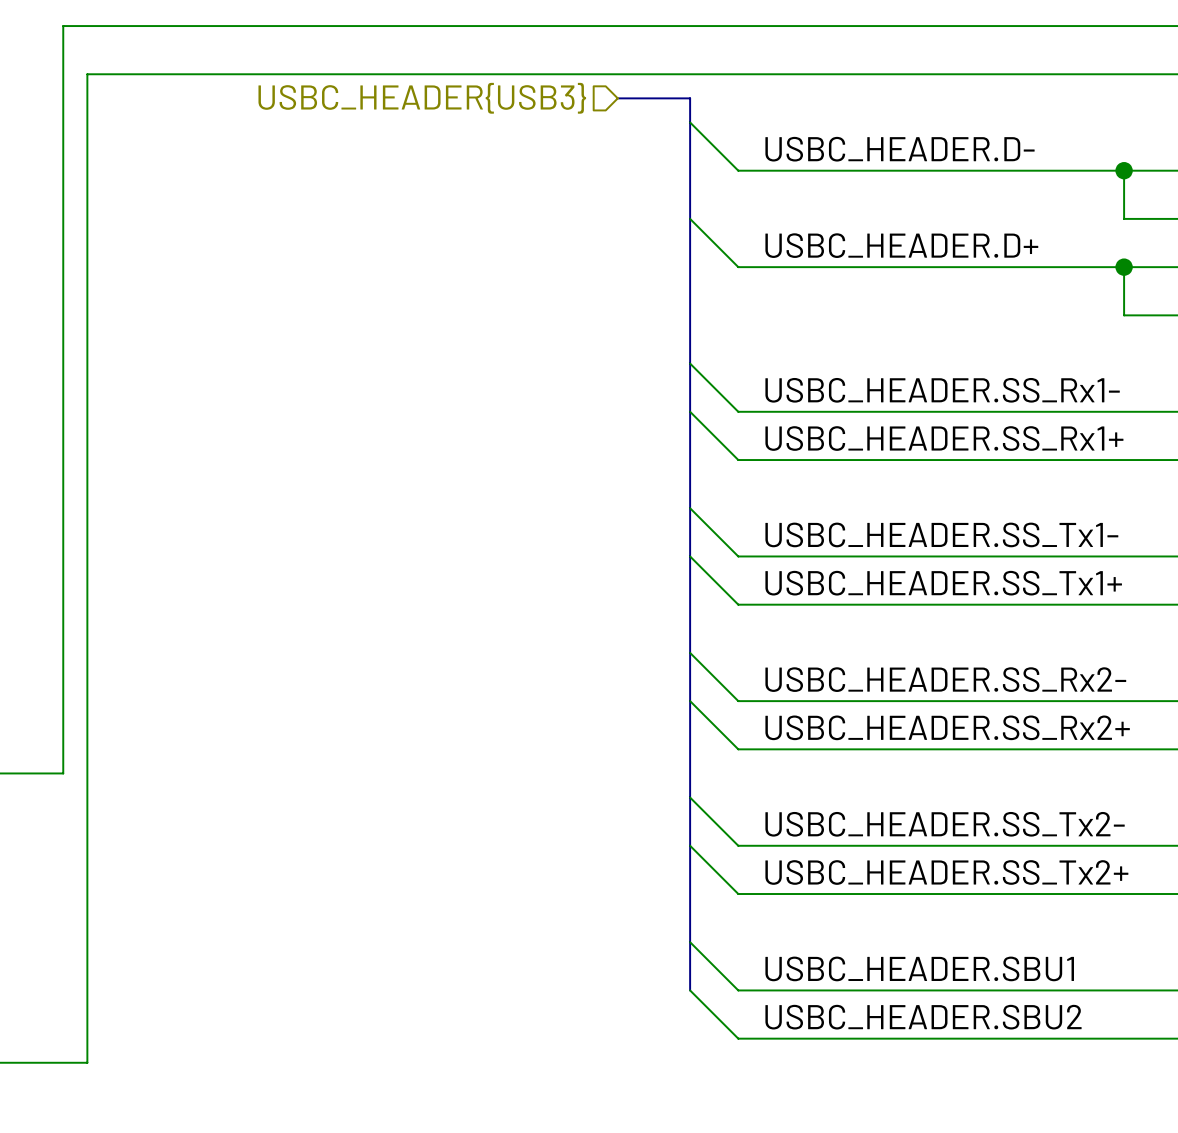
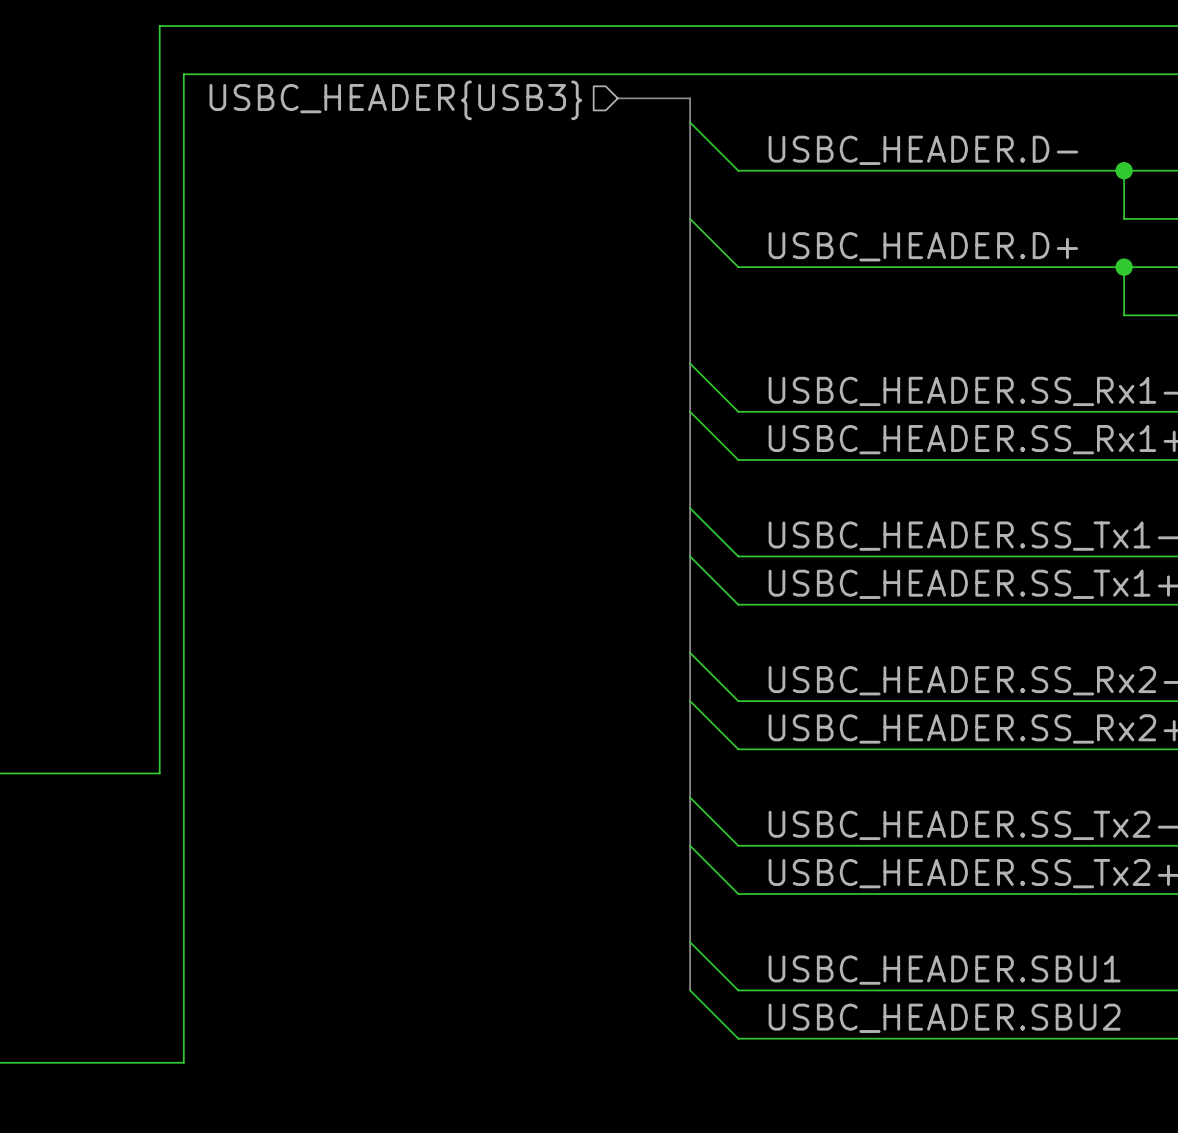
wire: (159, 26) (63, 26) (63, 773) -> (159, 26) (159, 773) (63, 773)
wire: (183, 74) (87, 74) (87, 1062) -> (183, 74) (183, 1062) (87, 1062)

